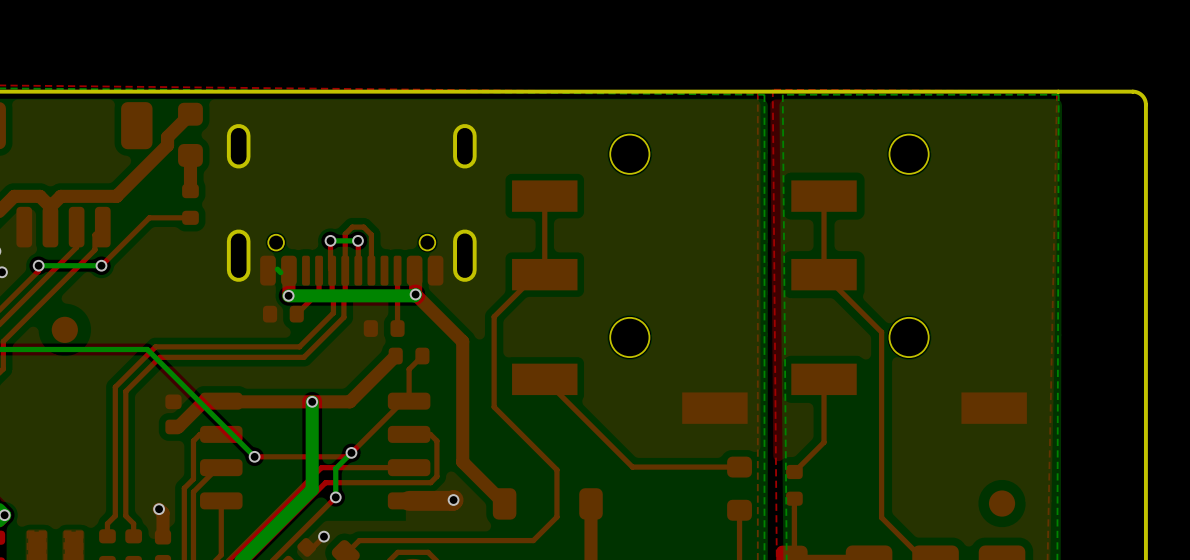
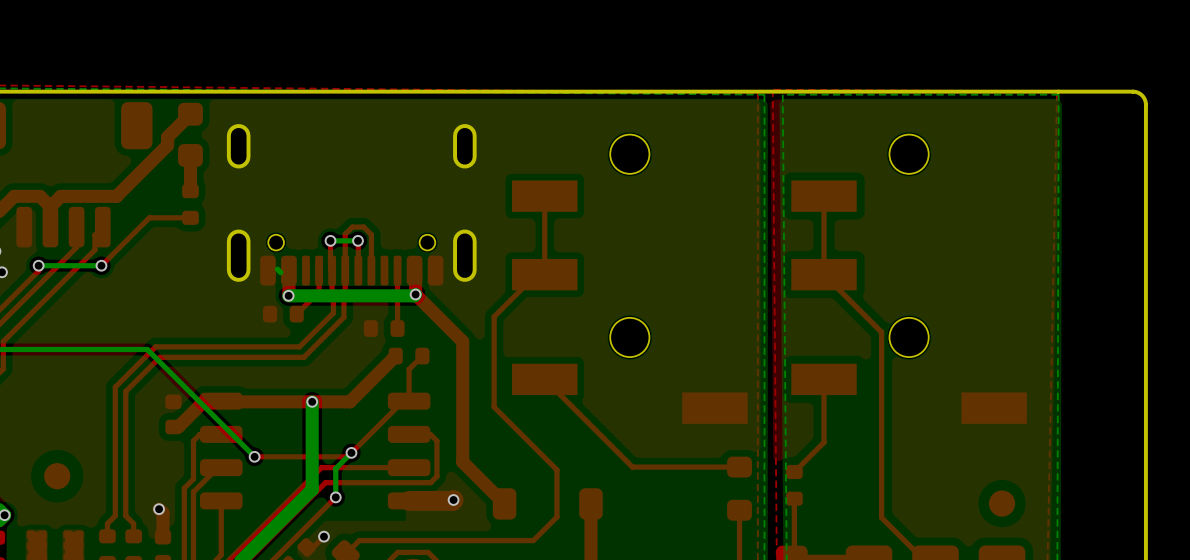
part position: (64, 329) -> (57, 476)

